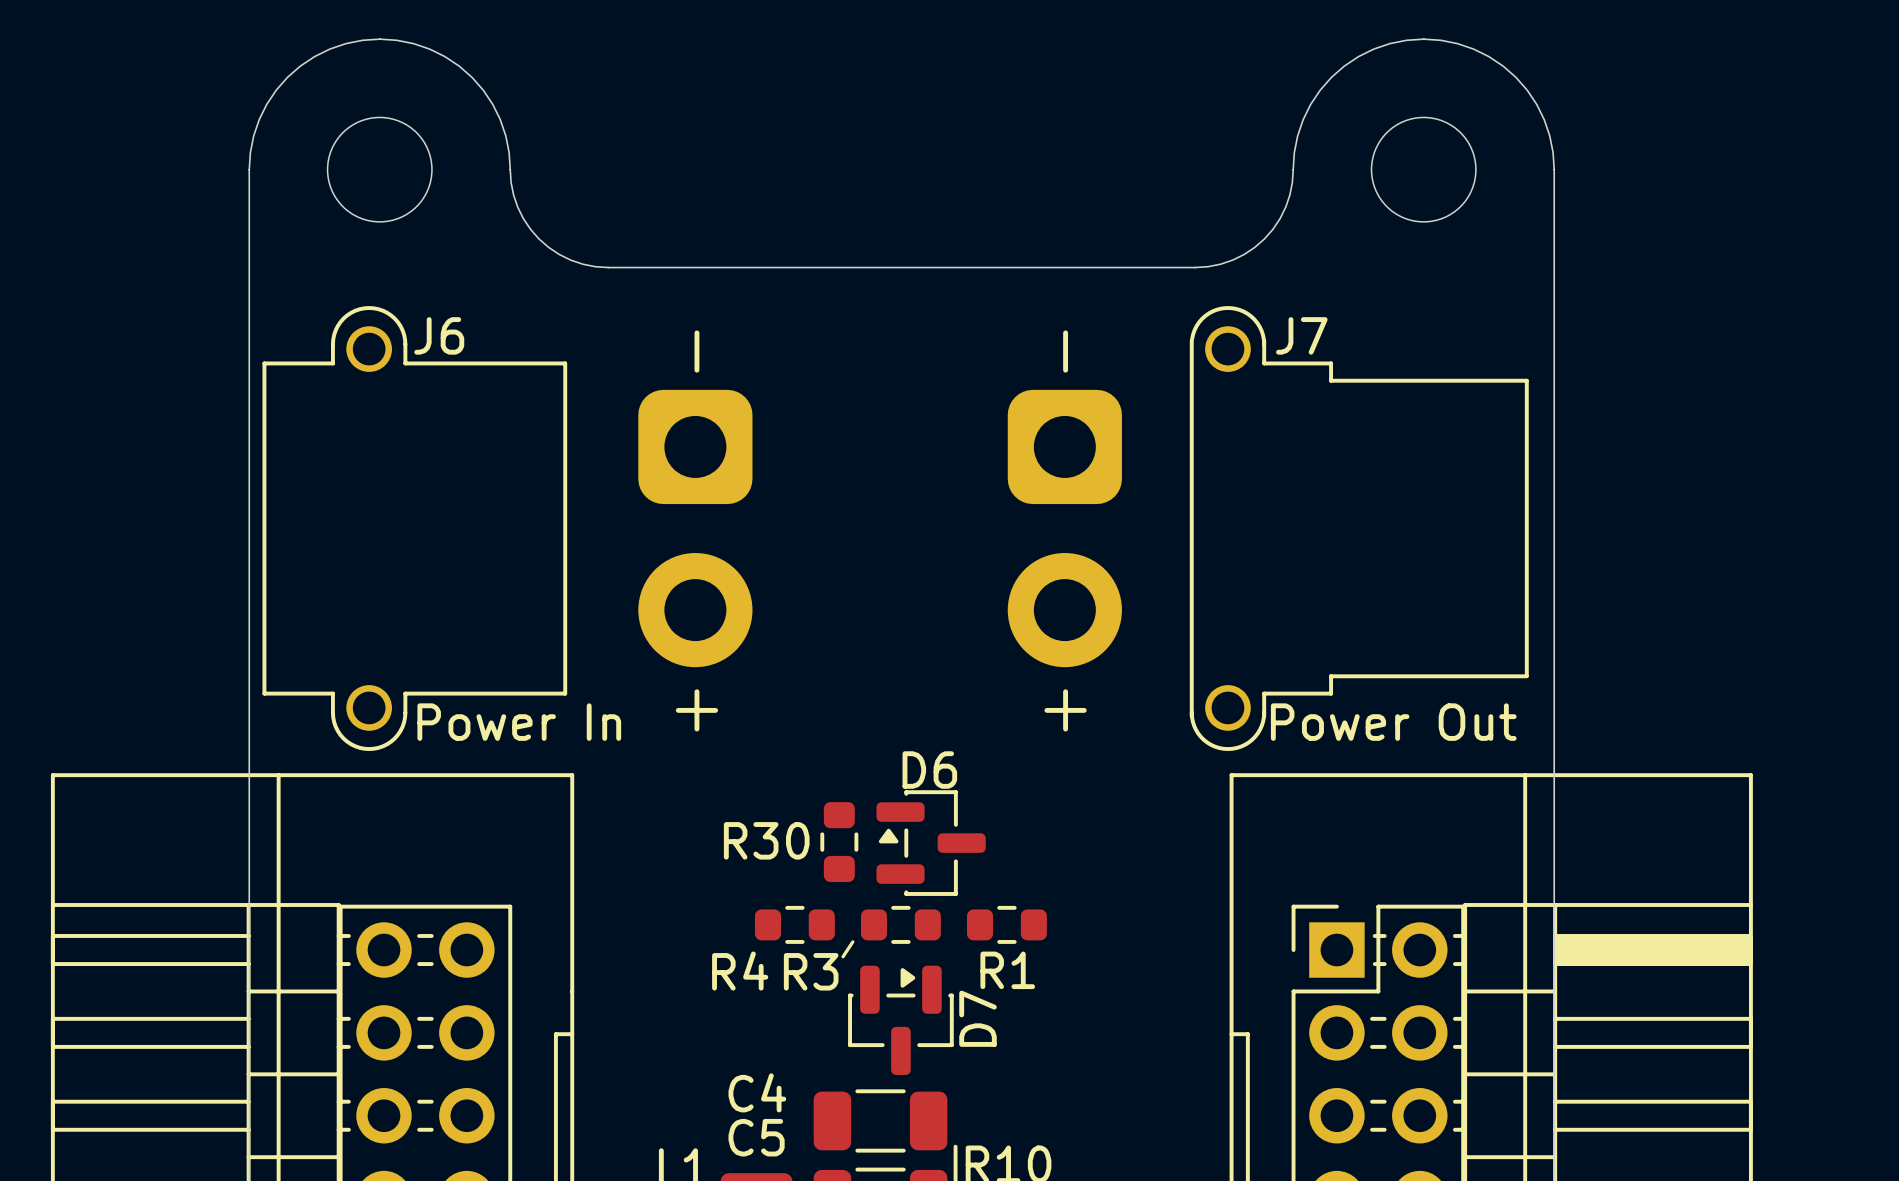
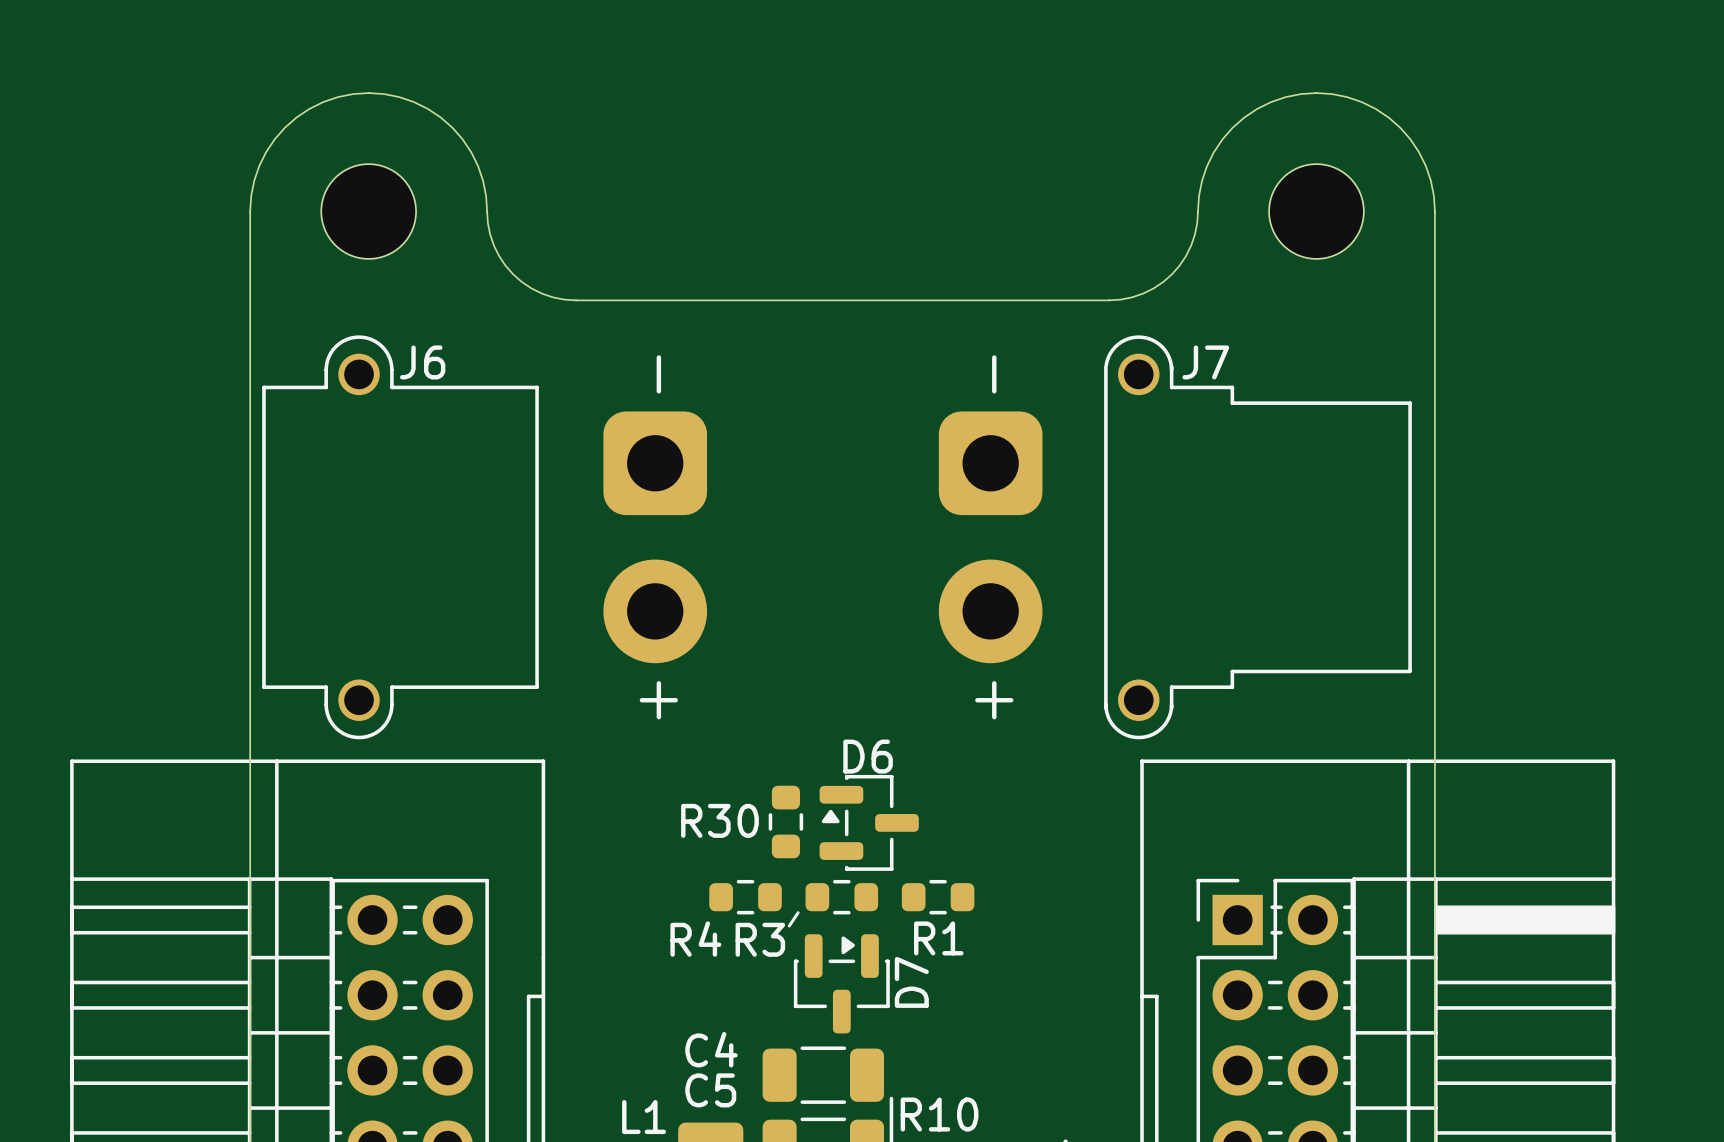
J6 text: none -> - (658, 374)
J7 text: none -> - (994, 374)
text: - (696, 351) -> none
text: - (1065, 351) -> none
J6 text: none -> + (658, 700)
J7 text: none -> + (994, 700)
text: + (696, 710) -> none
text: + (1065, 710) -> none
J6 value: Power In (519, 722) -> none
J7 value: Power Out (1393, 722) -> none

